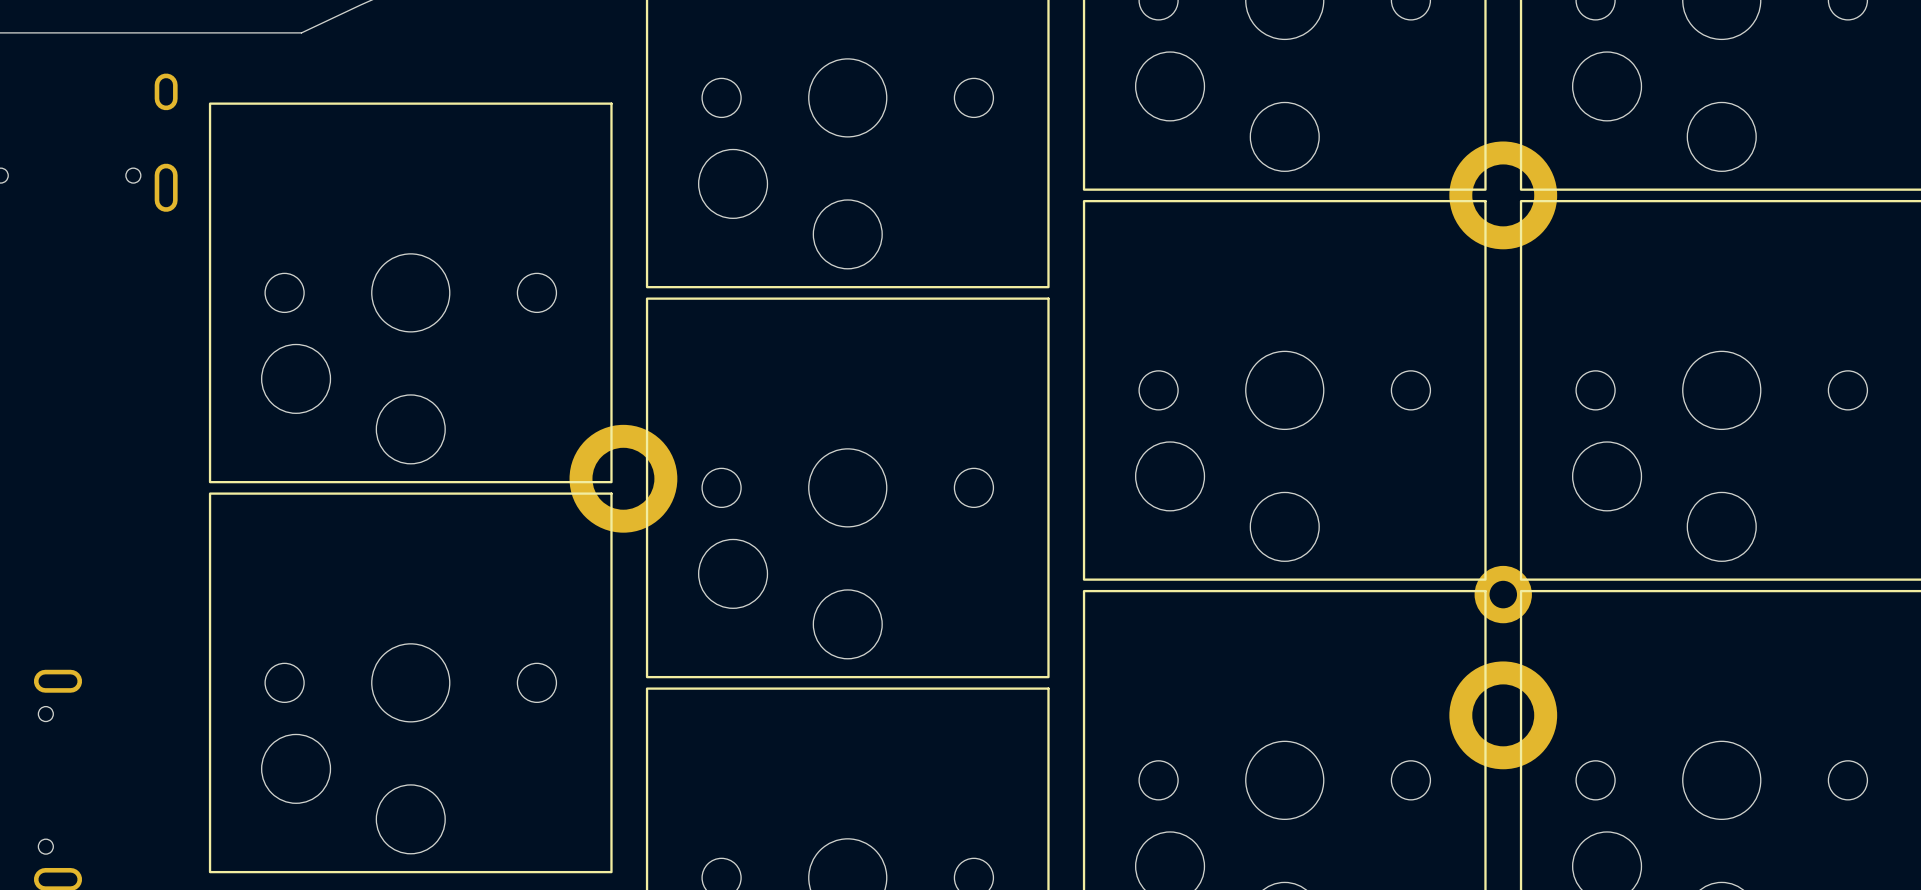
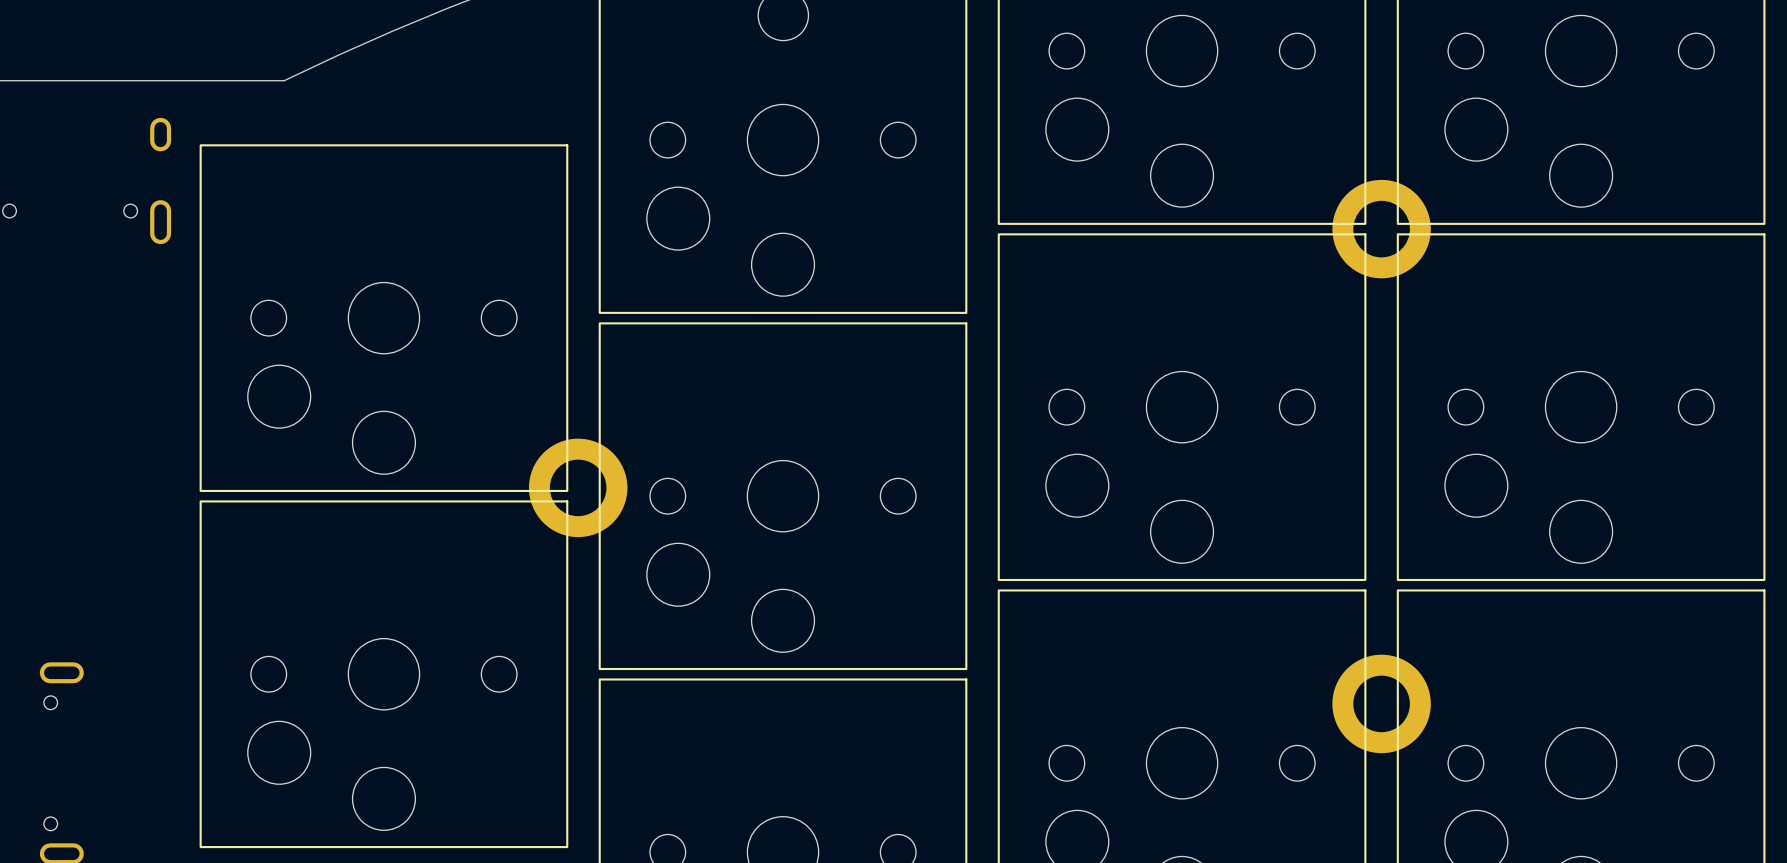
part: (1503, 594) -> none

